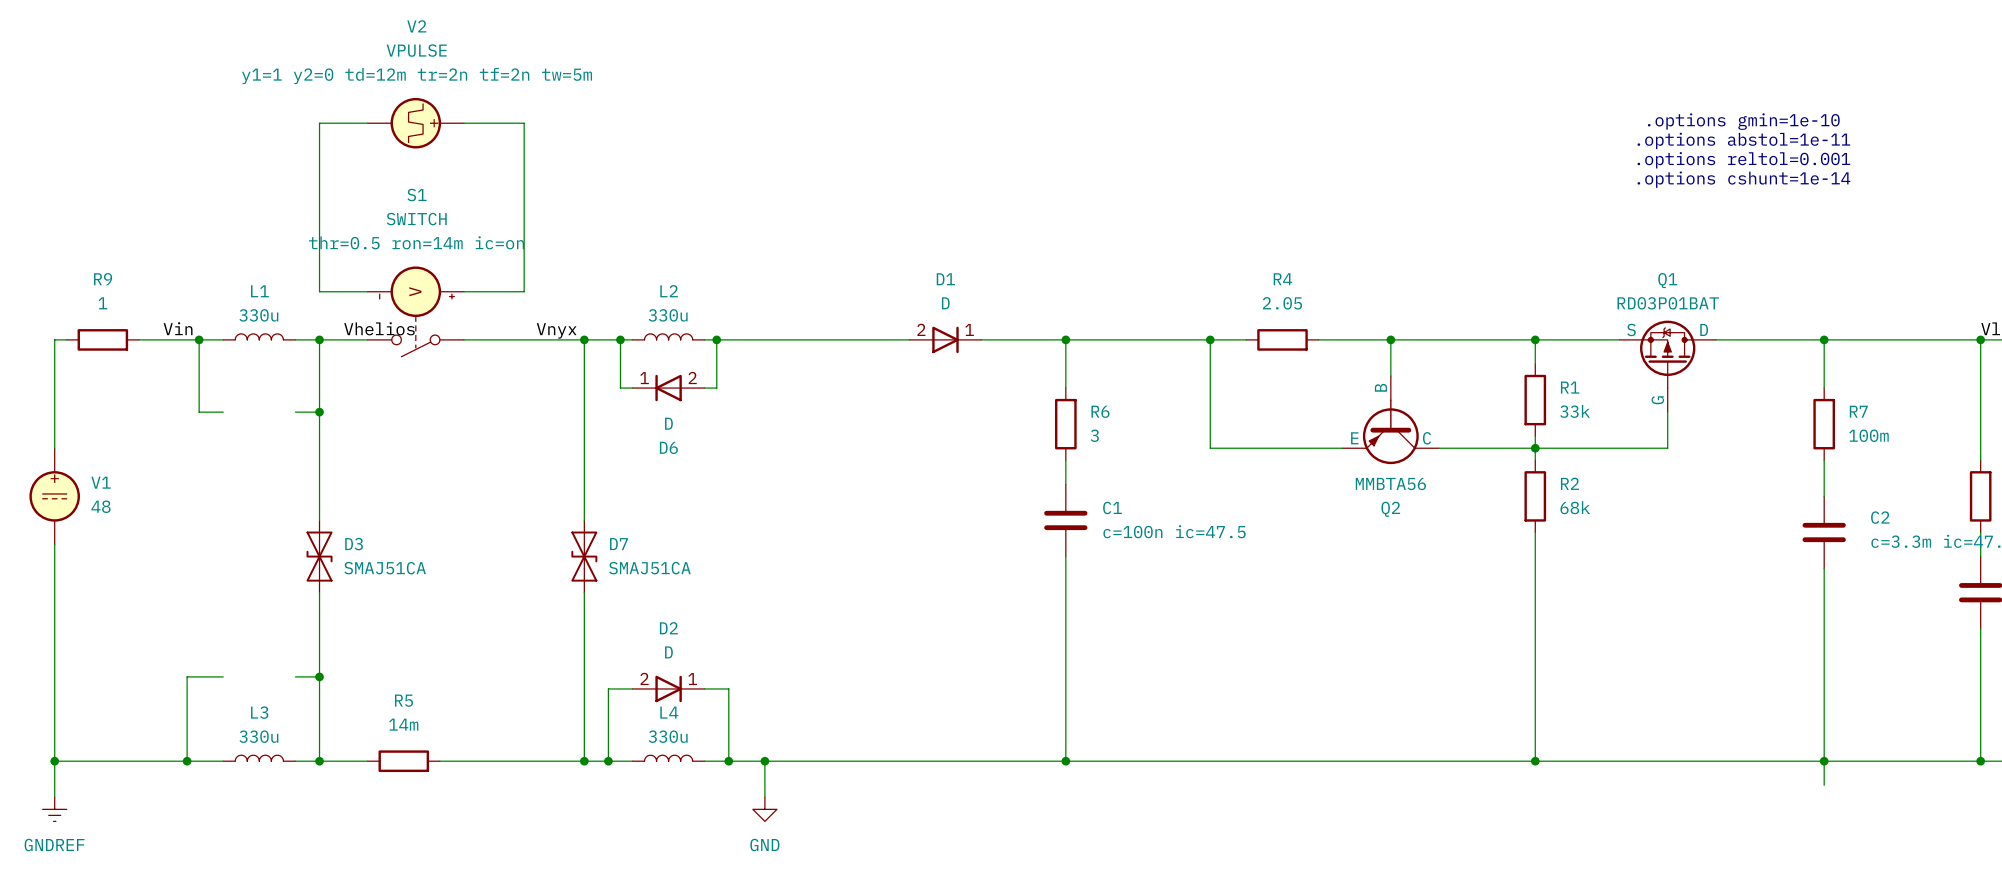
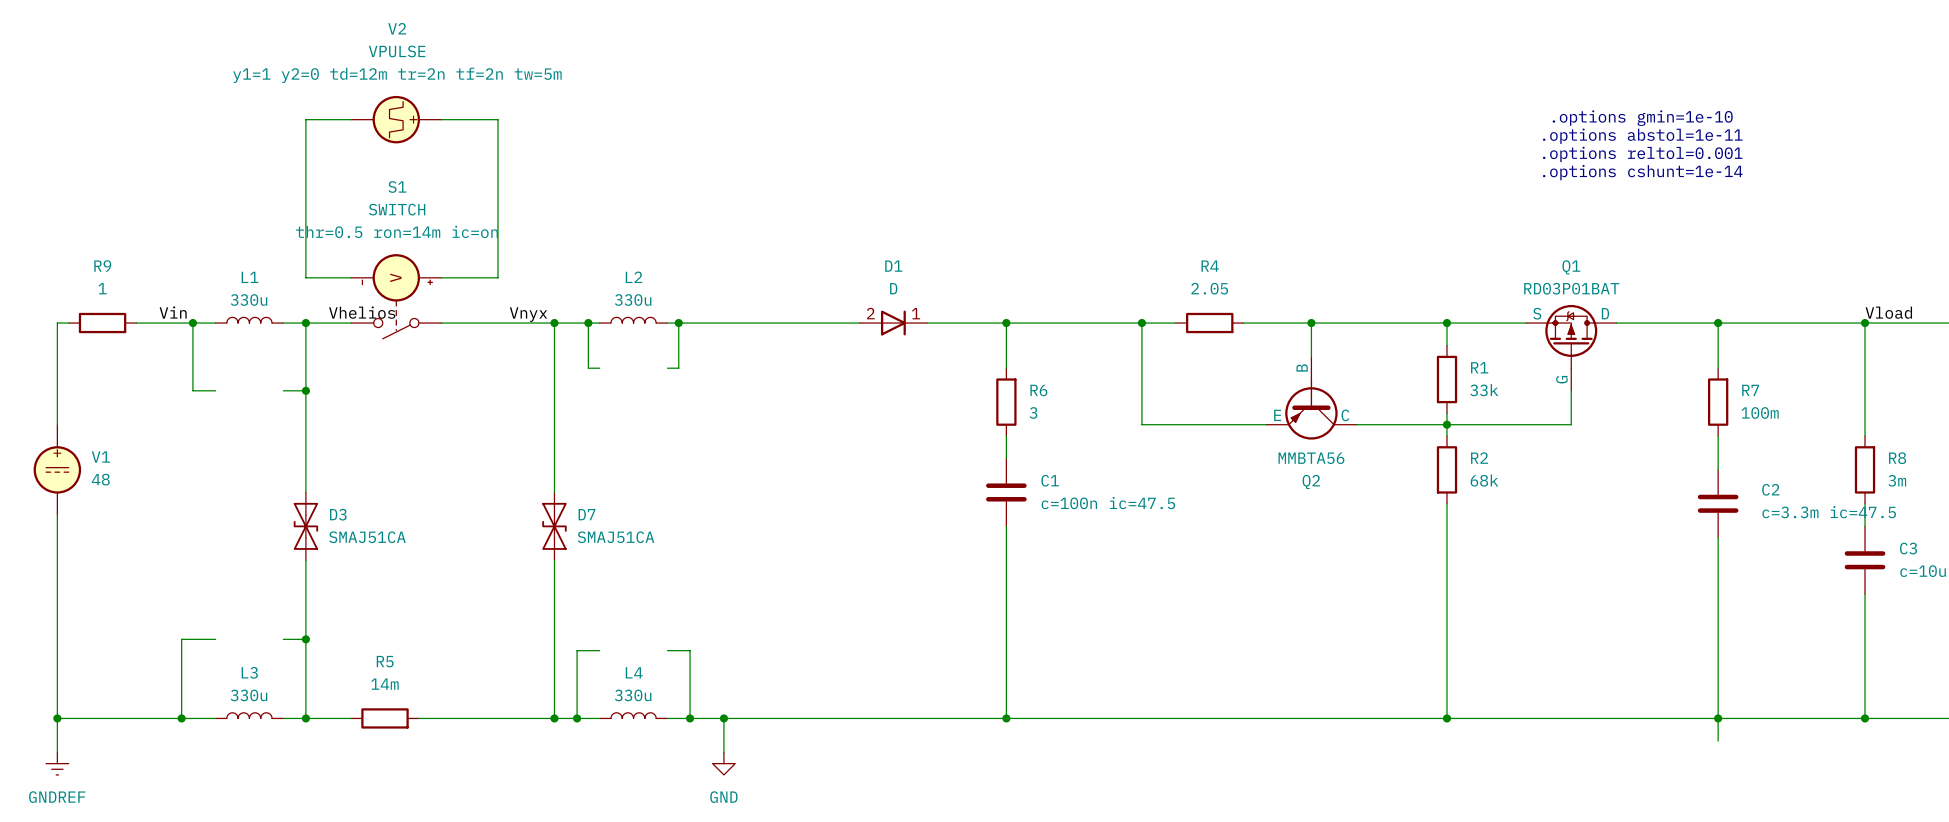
D6: D (668, 388) -> none
D2: D (668, 688) -> none

